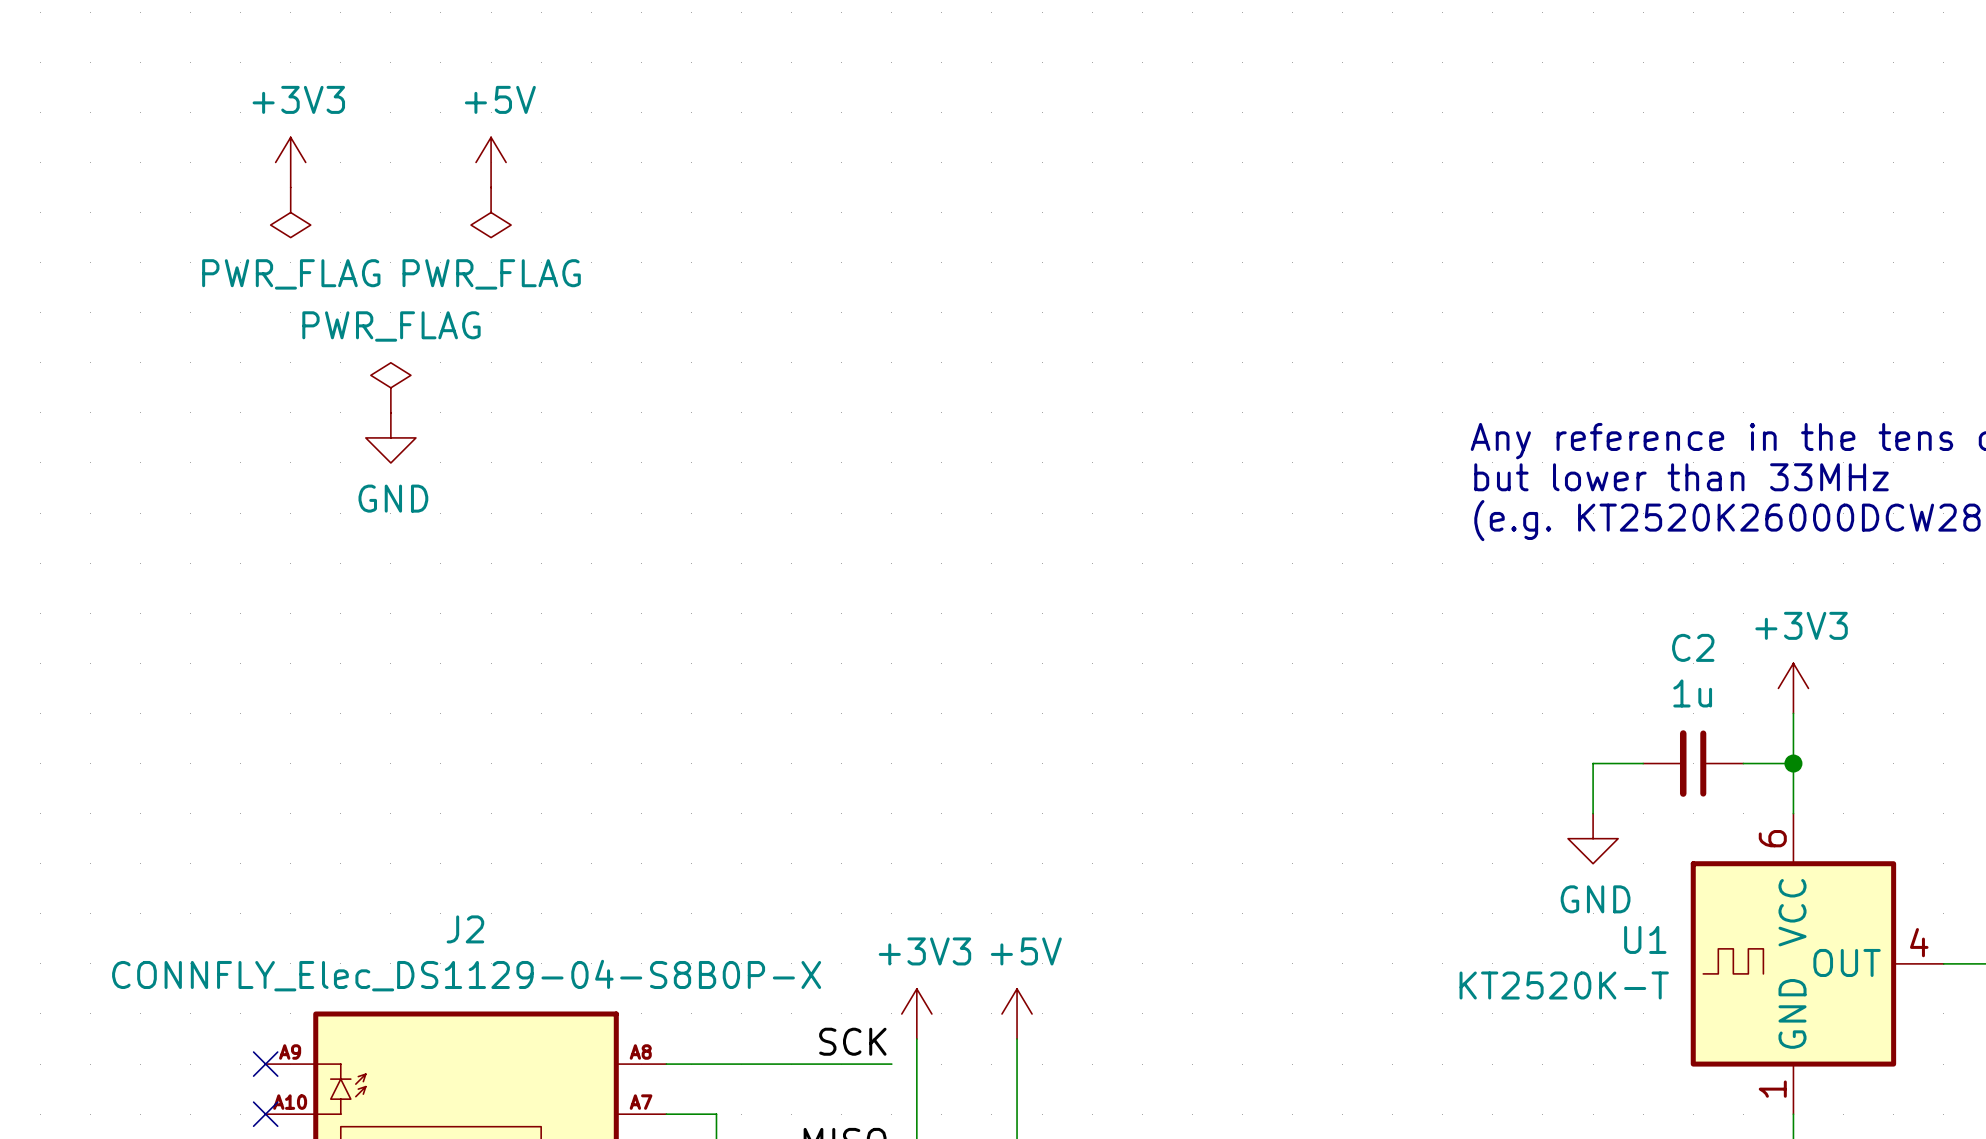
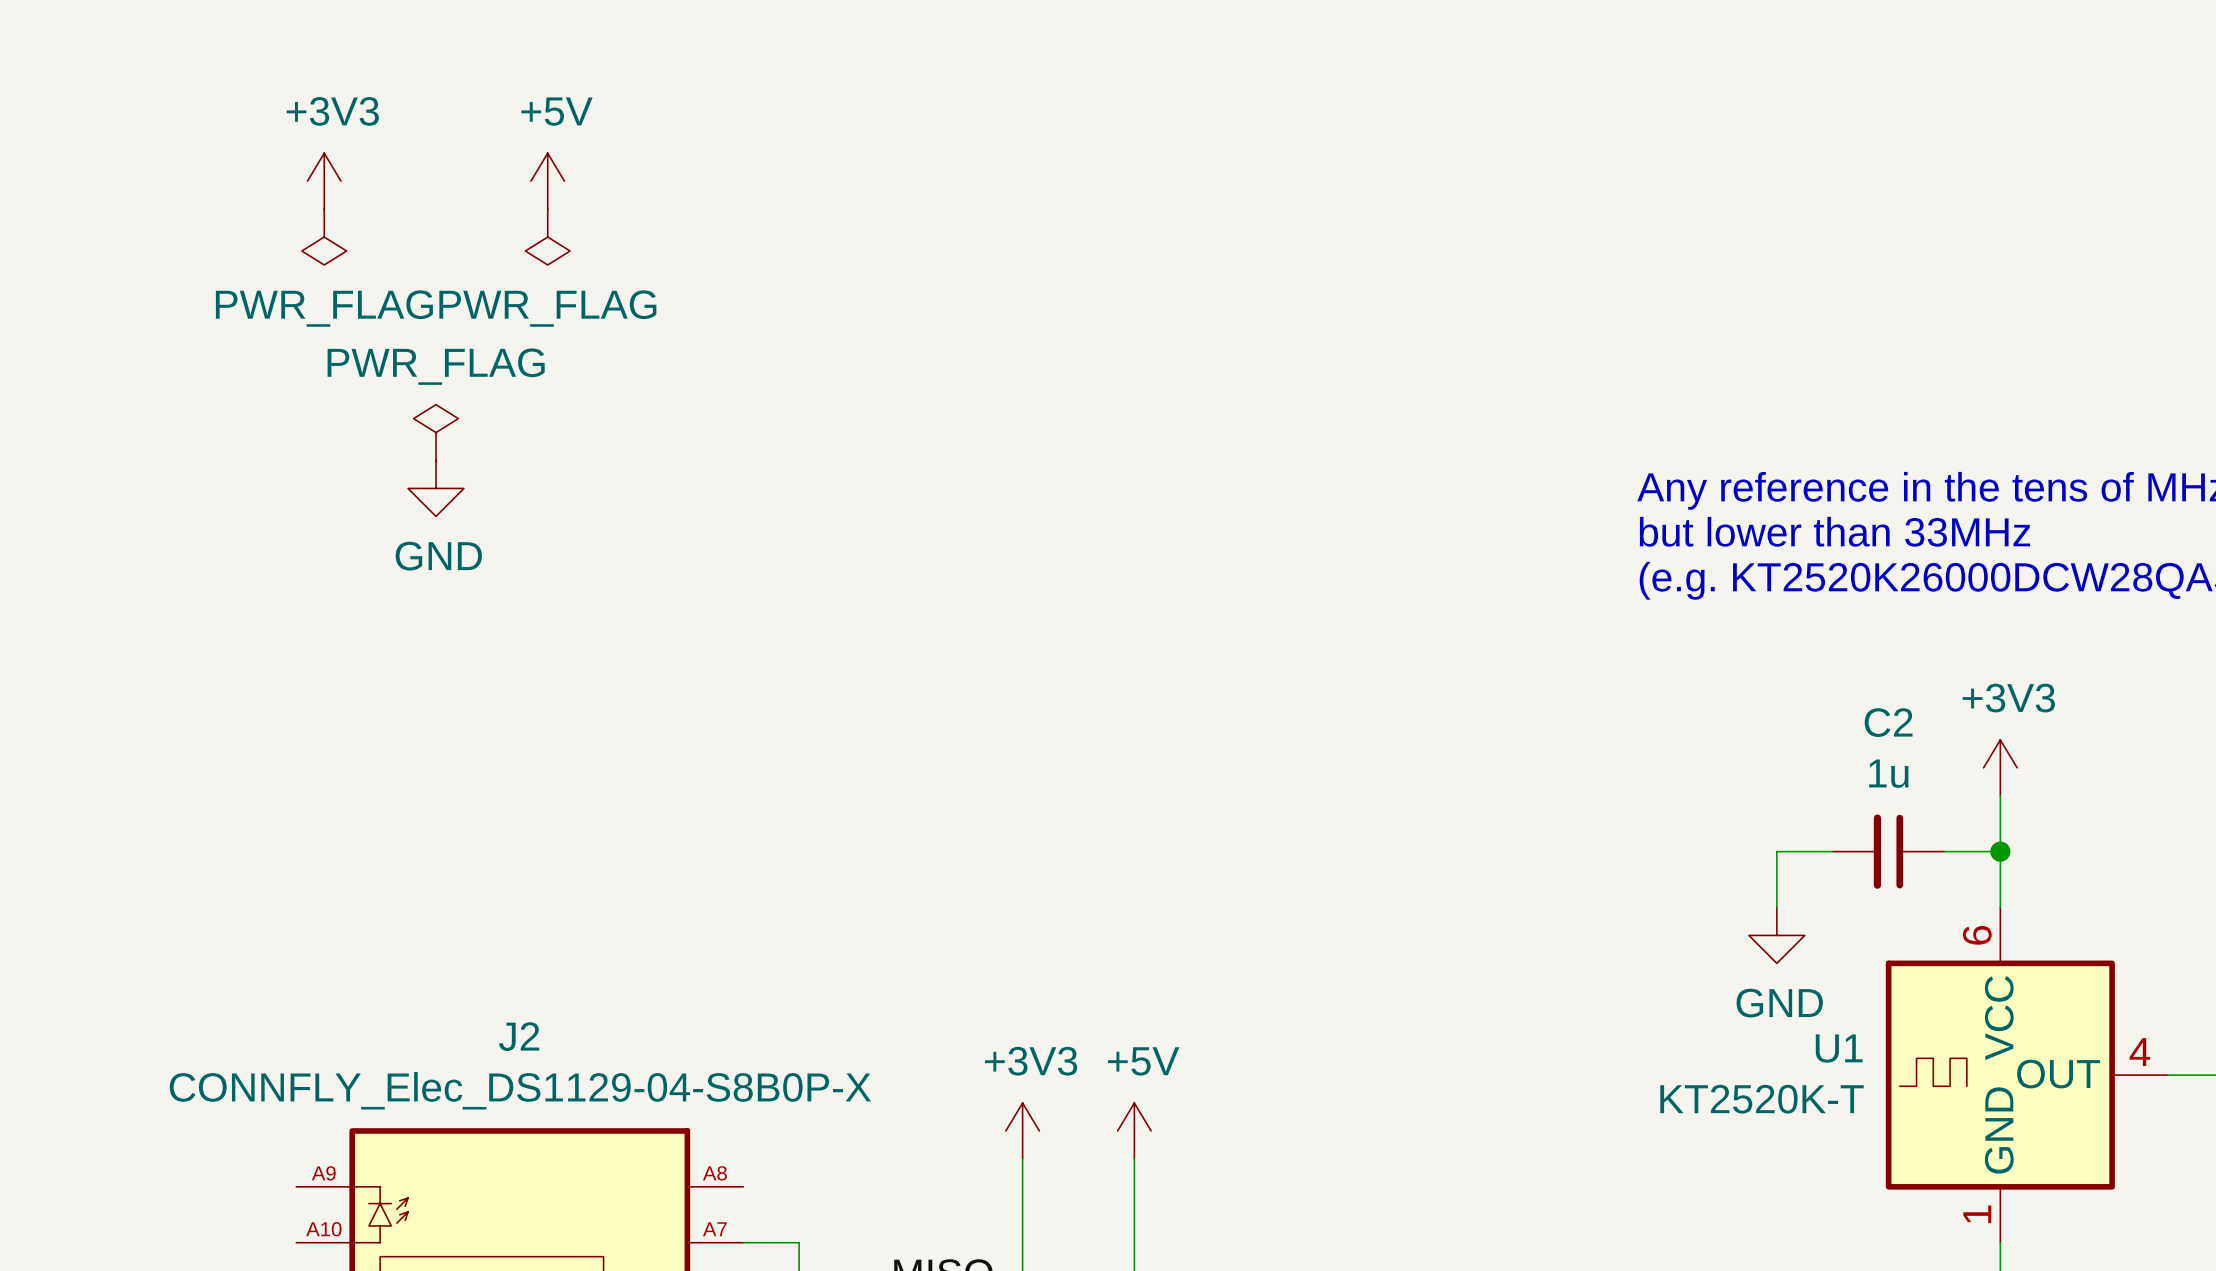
label: SCK (852, 1041) -> none
no-connect mark: (265, 1064) -> none
wire: (666, 1064) (891, 1064) -> none
no-connect mark: (265, 1114) -> none

